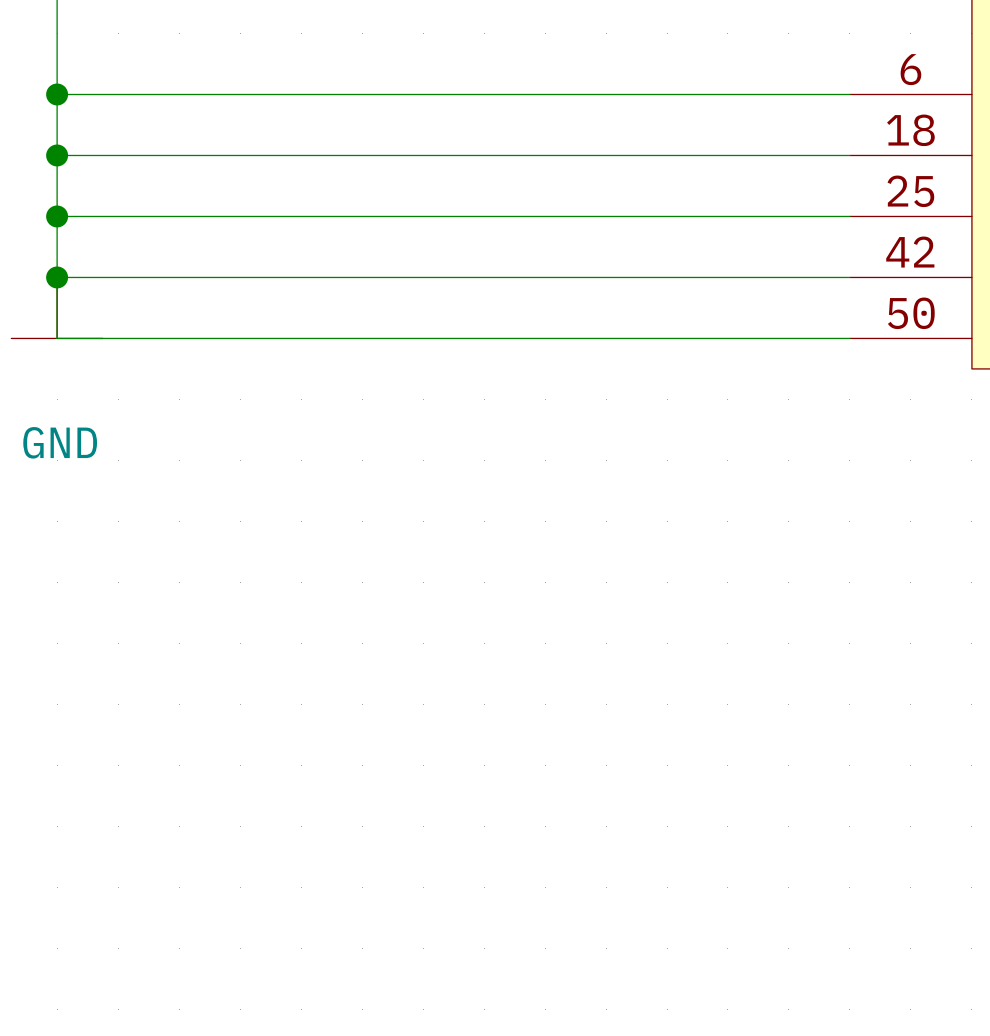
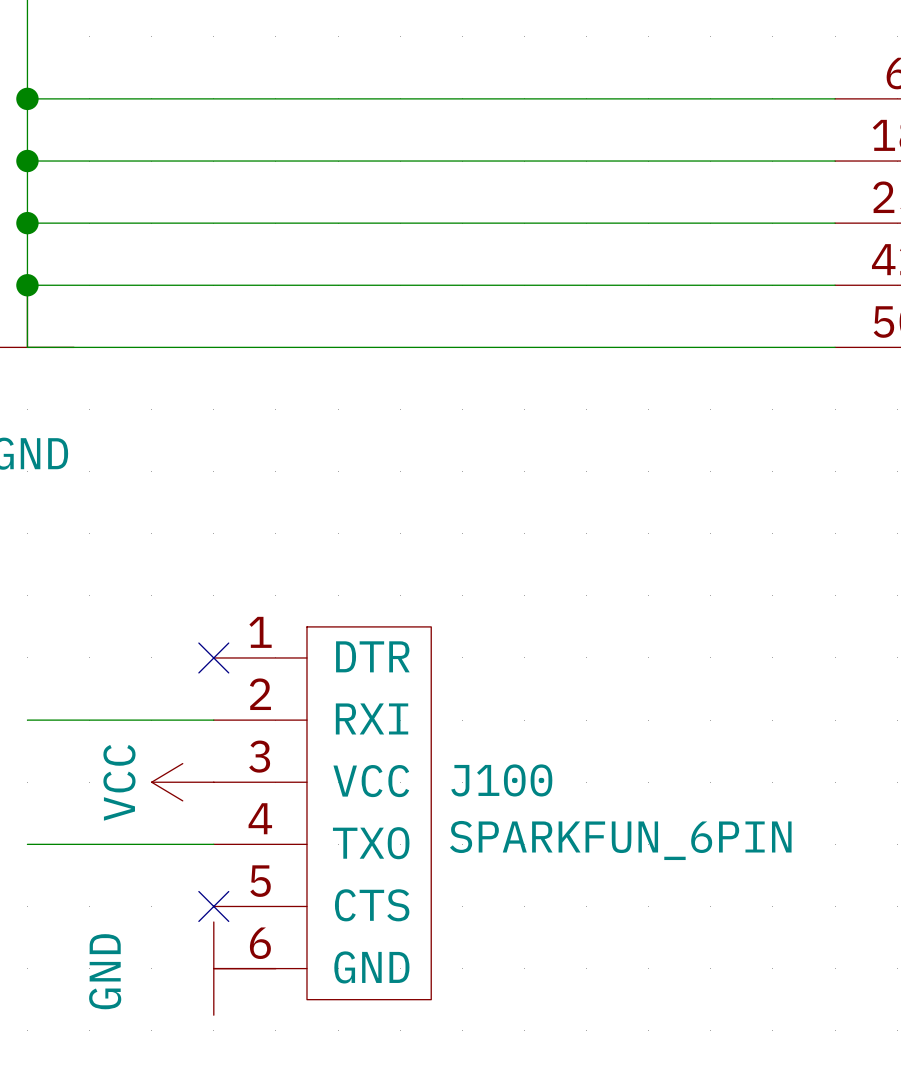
no-connect mark: none -> (213, 657)
wire: none -> (27, 720) (213, 720)
power symbol: none -> VCC (182, 782)
J100: none -> SPARKFUN_6PIN (322, 813)
wire: none -> (27, 844) (213, 844)
no-connect mark: none -> (213, 906)
power symbol: none -> GND (244, 968)

